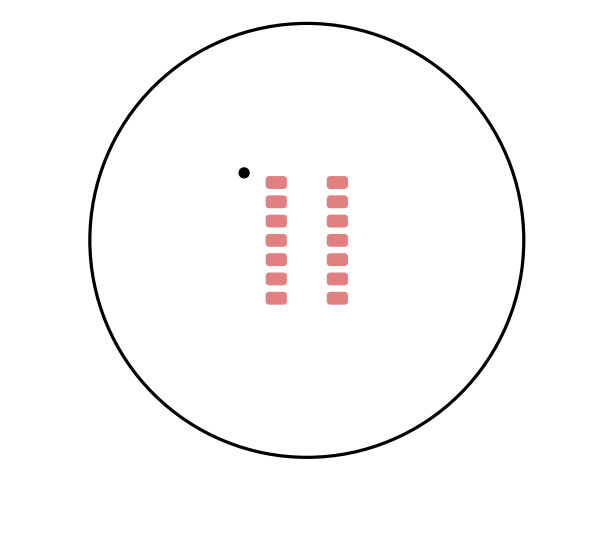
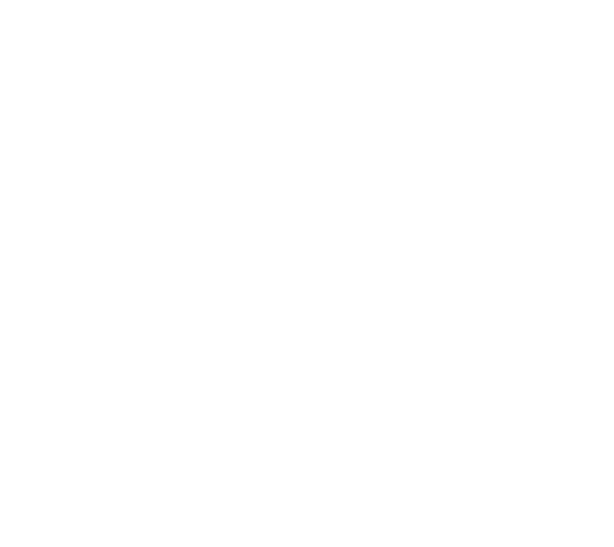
round board edge: [88, 21, 526, 459] -> none
part: (293, 235) -> none

